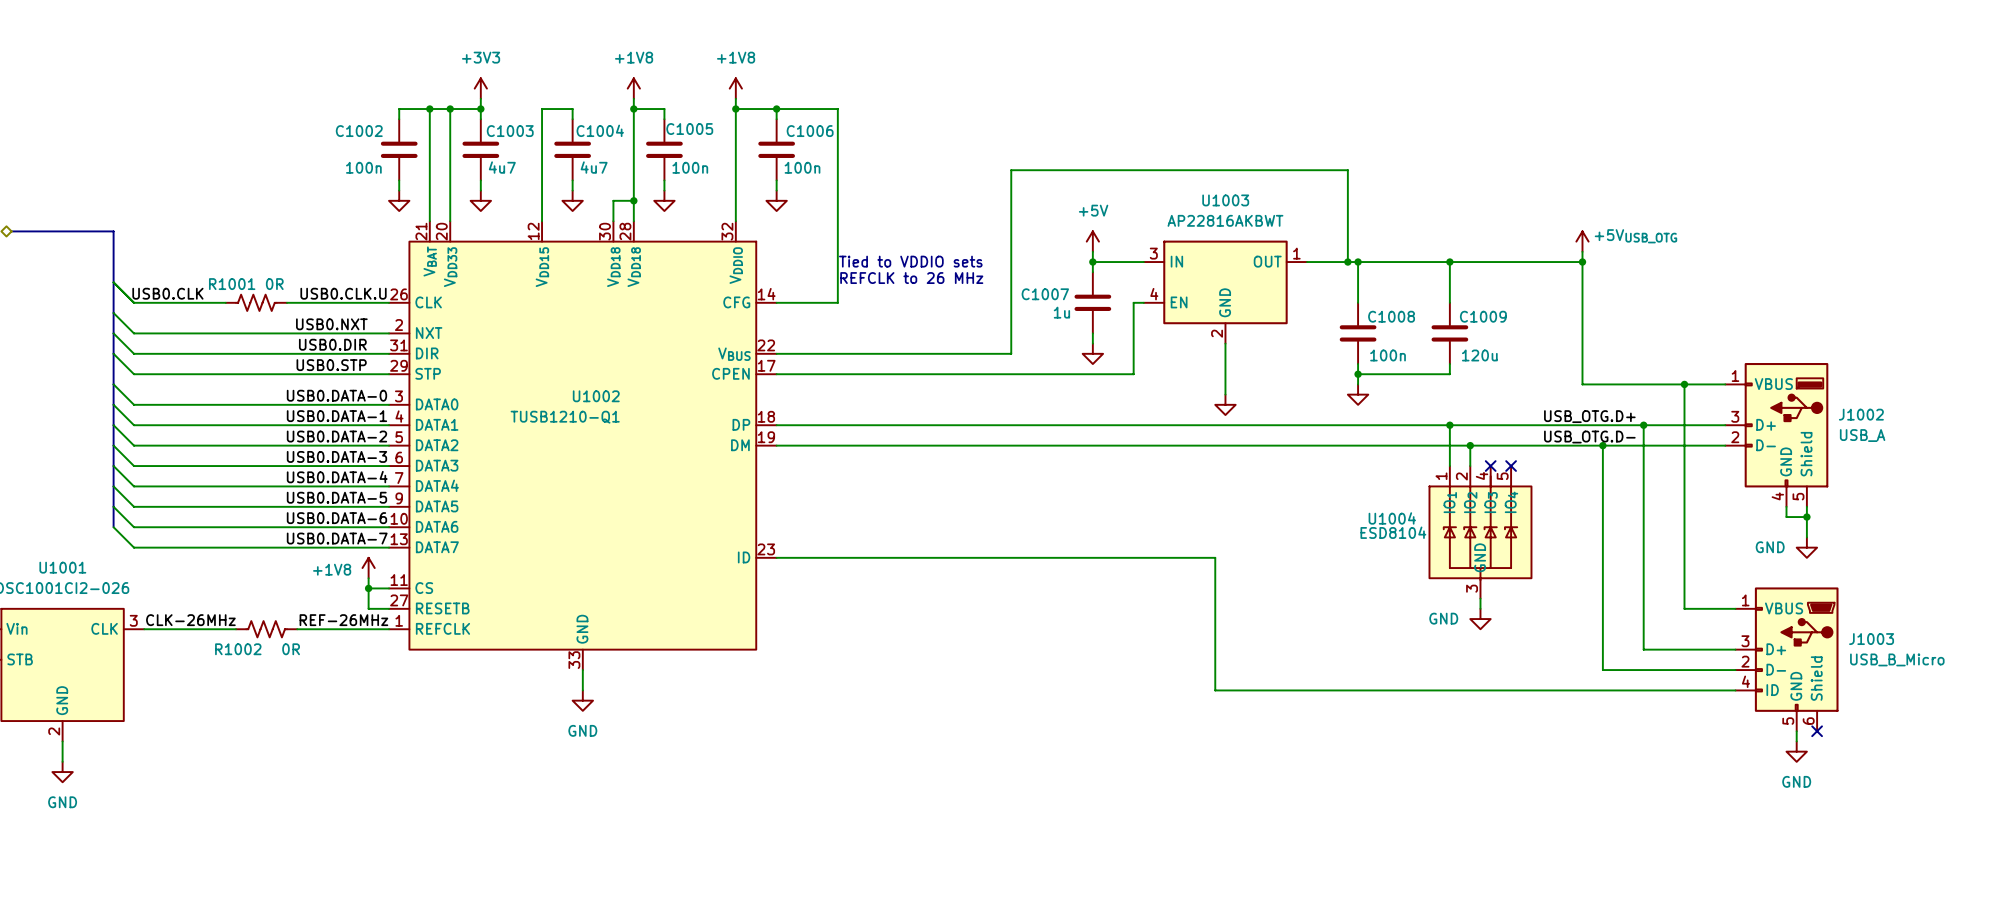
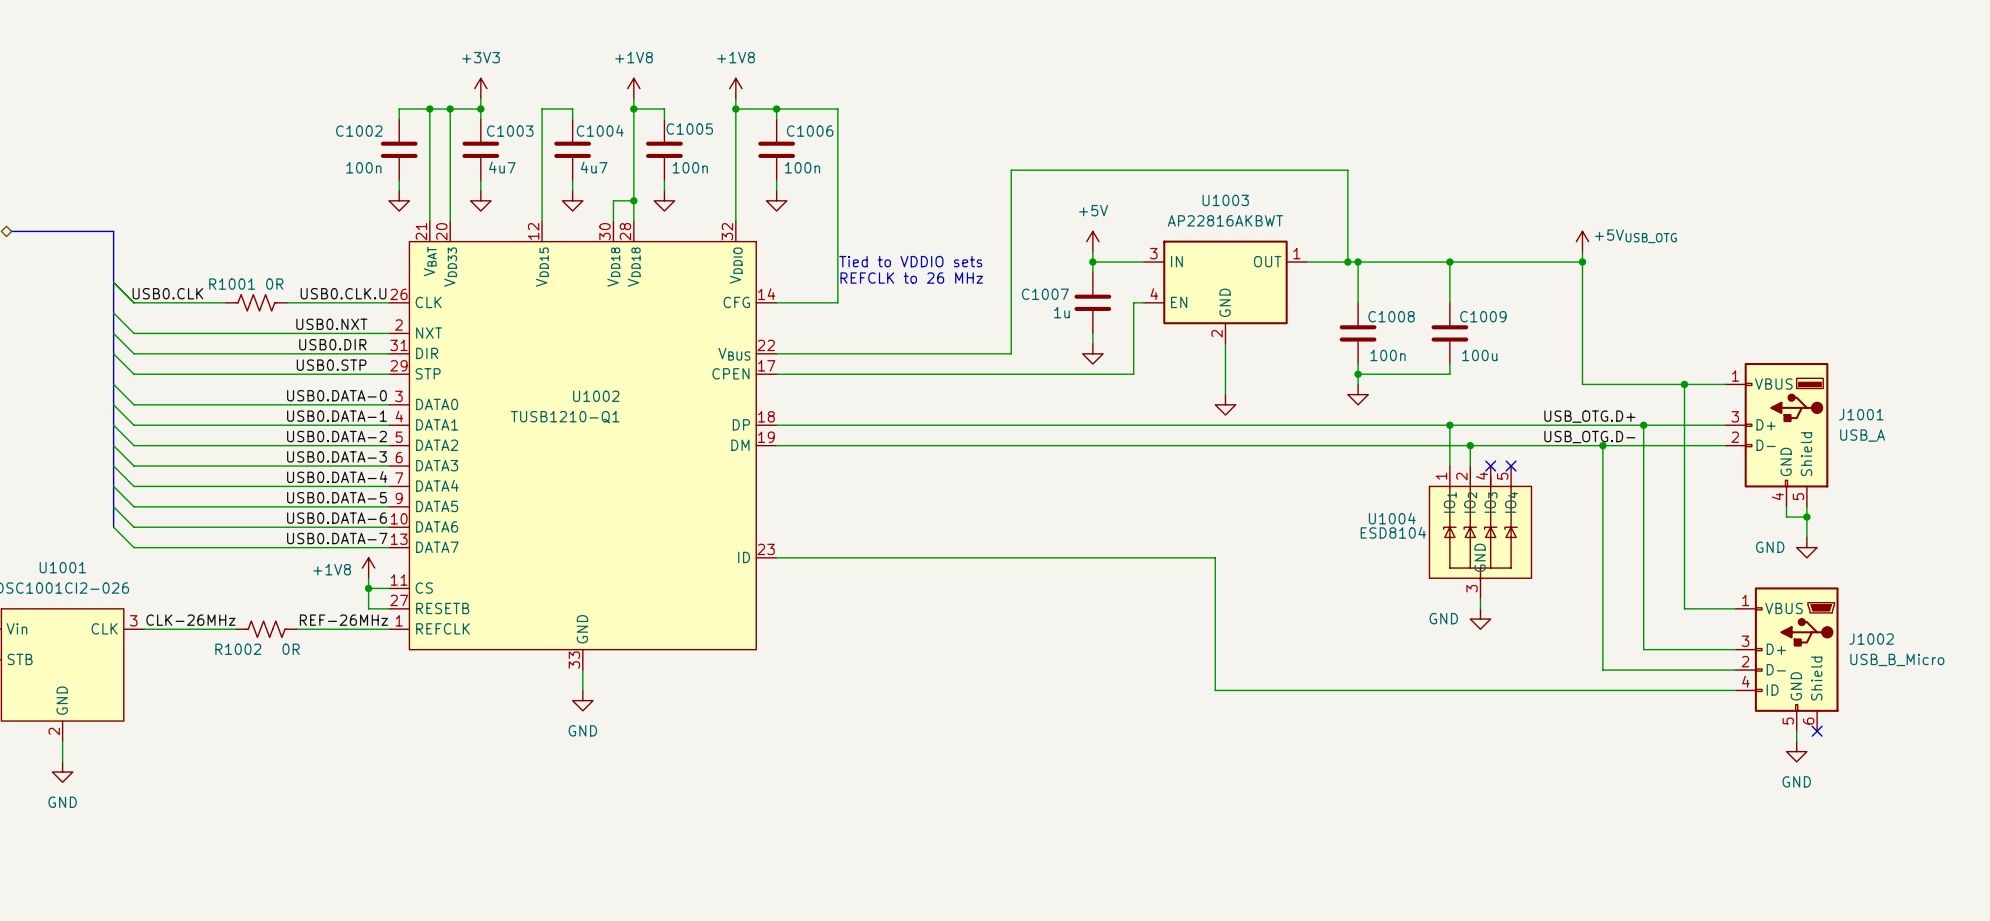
C1009 value: 120u (1479, 355) -> 100u (1479, 355)
J1002 name: J1002 (1861, 414) -> J1001 (1861, 414)
J1003 name: J1003 (1871, 639) -> J1002 (1871, 639)

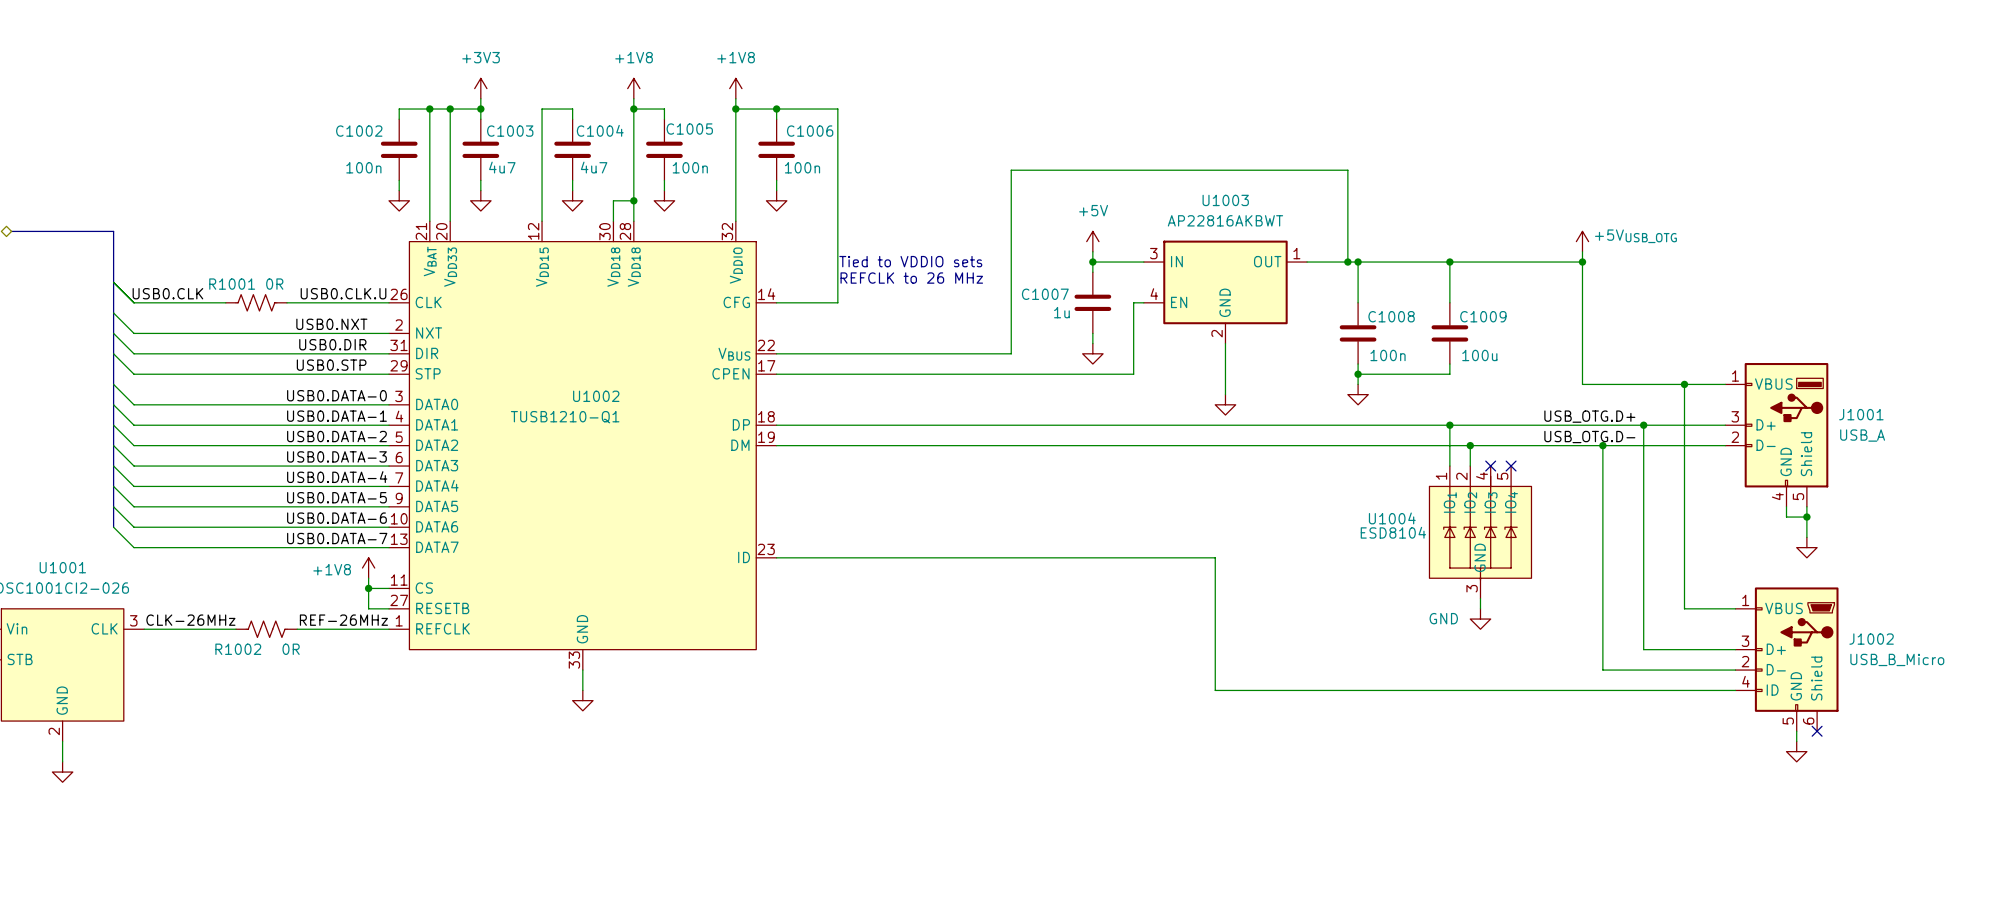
power symbol text: GND (1770, 547) -> none
power symbol text: GND (582, 730) -> none
power symbol text: GND (1796, 781) -> none
power symbol text: GND (62, 802) -> none

